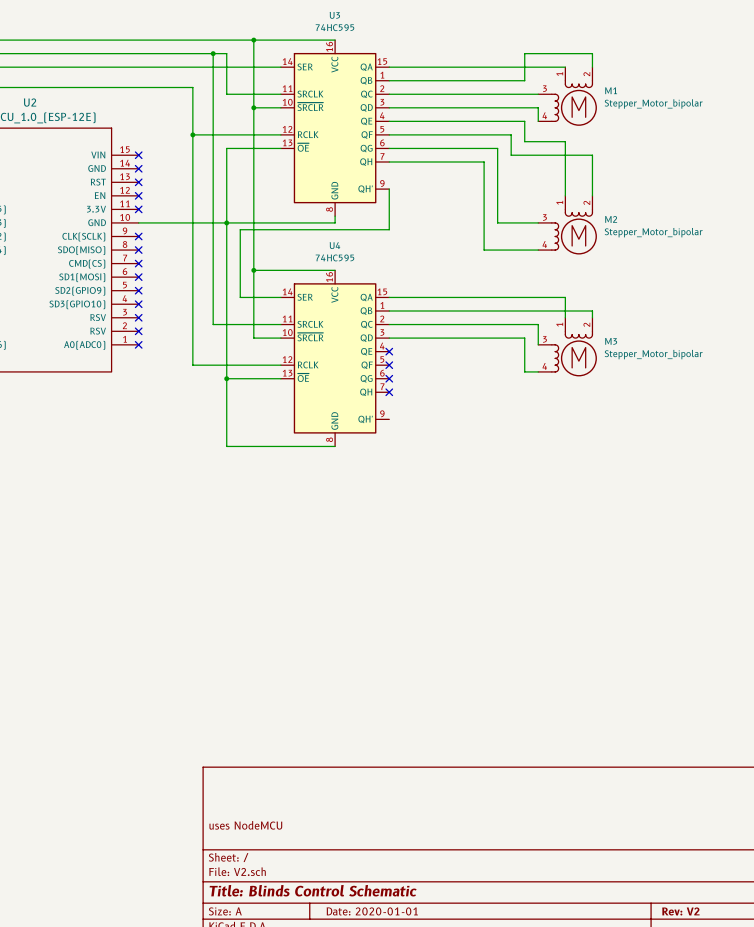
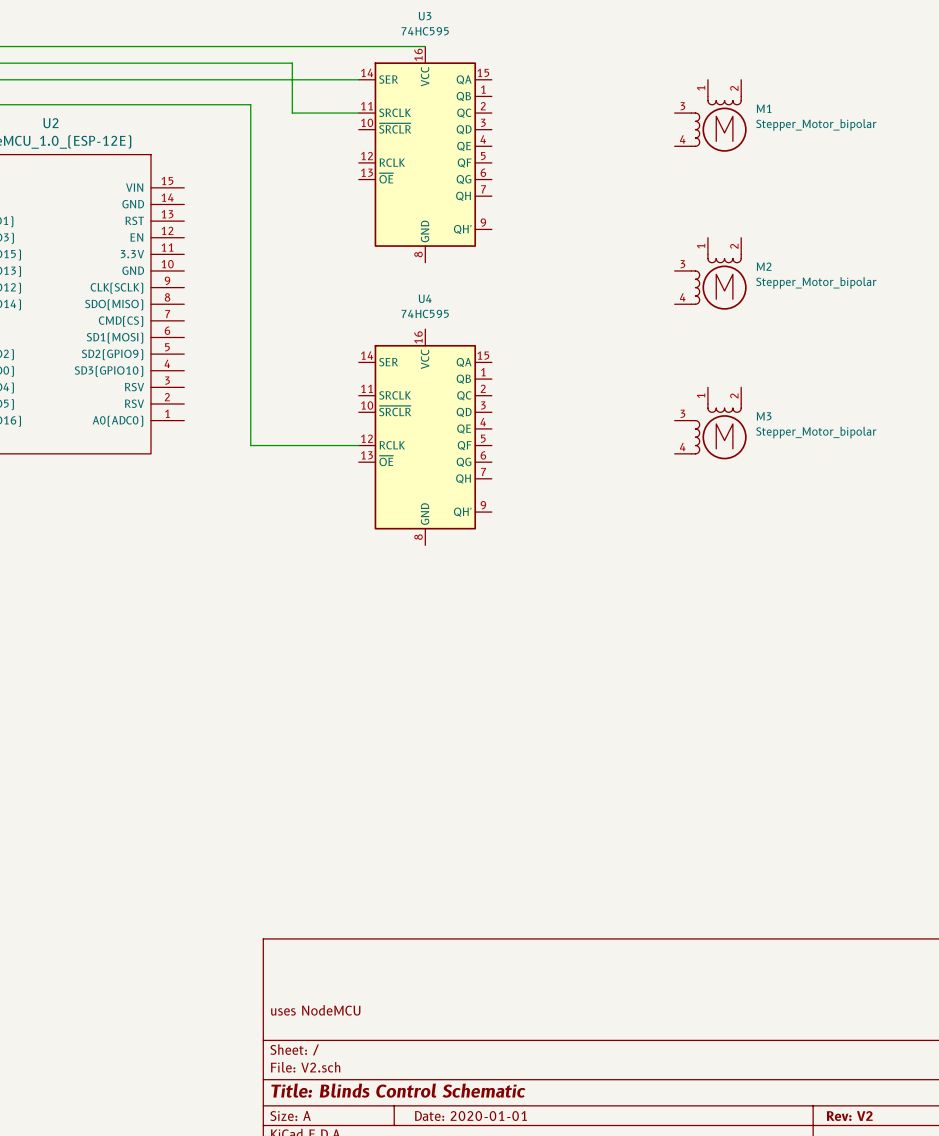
wire: (253, 40) (253, 338) (280, 338) -> none
junction: (253, 40) -> none
wire: (213, 53) (213, 324) (280, 324) -> none
junction: (213, 53) -> none
wire: (389, 67) (565, 67) -> none
wire: (592, 67) (592, 53) (524, 53) (524, 80) (389, 80) -> none
wire: (389, 94) (538, 94) -> none
wire: (253, 107) (280, 107) -> none
junction: (253, 107) -> none
wire: (389, 107) (538, 107) (538, 121) -> none
wire: (389, 121) (524, 121) (524, 141) (565, 141) (565, 195) -> none
wire: (192, 134) (280, 134) -> none
junction: (192, 134) -> none
wire: (389, 134) (511, 134) (511, 155) (592, 155) (592, 195) -> none
wire: (280, 148) (226, 148) (226, 446) (335, 446) -> none
wire: (389, 148) (497, 148) (497, 222) (538, 222) -> none
no-connect mark: (138, 155) -> none
wire: (389, 161) (484, 161) (484, 250) (538, 250) -> none
no-connect mark: (138, 168) -> none
no-connect mark: (138, 182) -> none
wire: (389, 189) (389, 229) (240, 229) (240, 297) (280, 297) -> none
no-connect mark: (138, 195) -> none
no-connect mark: (138, 209) -> none
wire: (335, 216) (335, 222) (138, 222) -> none
junction: (226, 222) -> none
no-connect mark: (138, 236) -> none
no-connect mark: (138, 250) -> none
no-connect mark: (138, 263) -> none
wire: (253, 270) (335, 270) -> none
junction: (253, 270) -> none
no-connect mark: (138, 277) -> none
no-connect mark: (138, 290) -> none
wire: (389, 297) (565, 297) (565, 317) -> none
no-connect mark: (138, 304) -> none
wire: (389, 310) (592, 310) (592, 317) -> none
no-connect mark: (138, 317) -> none
wire: (389, 324) (538, 324) (538, 344) -> none
no-connect mark: (138, 331) -> none
wire: (389, 338) (524, 338) (524, 371) (538, 371) -> none
no-connect mark: (138, 344) -> none
no-connect mark: (389, 351) -> none
no-connect mark: (389, 365) -> none
wire: (226, 378) (280, 378) -> none
junction: (226, 378) -> none
no-connect mark: (389, 378) -> none
no-connect mark: (389, 392) -> none

